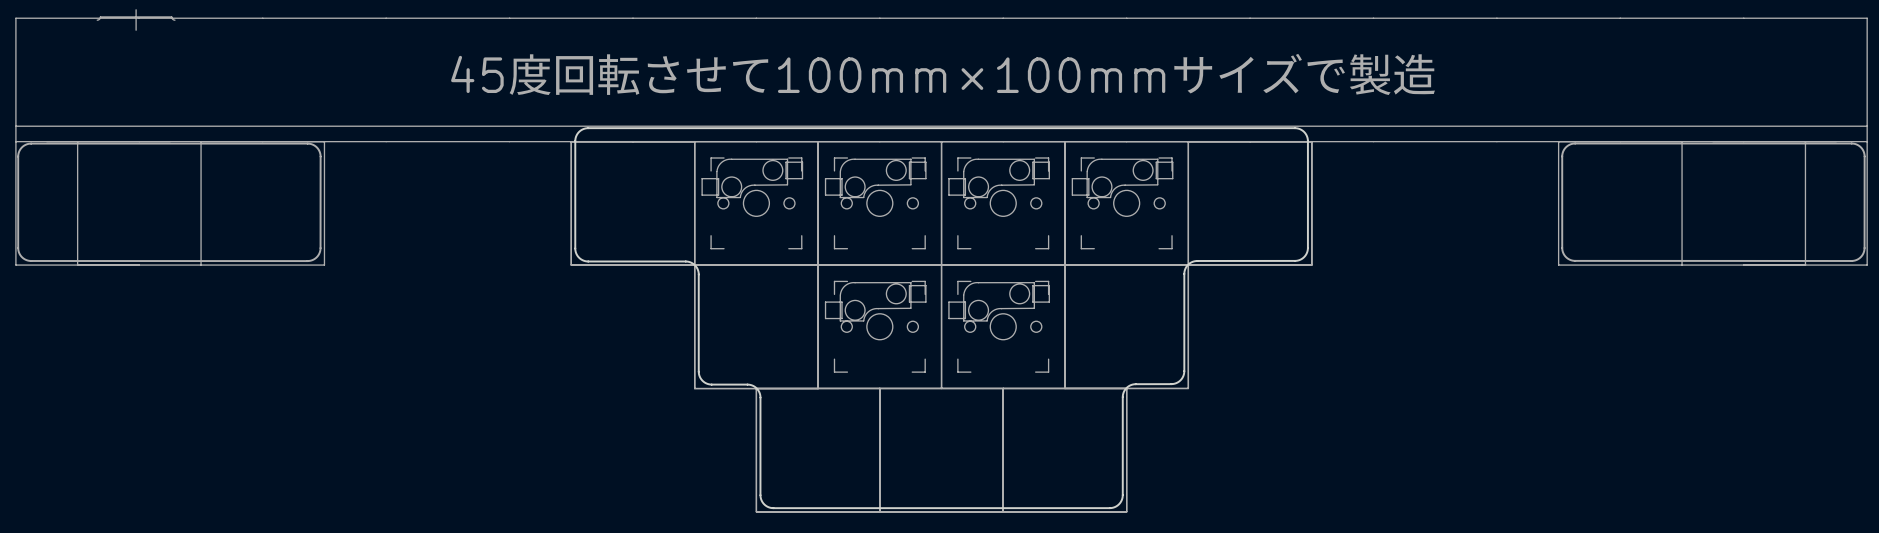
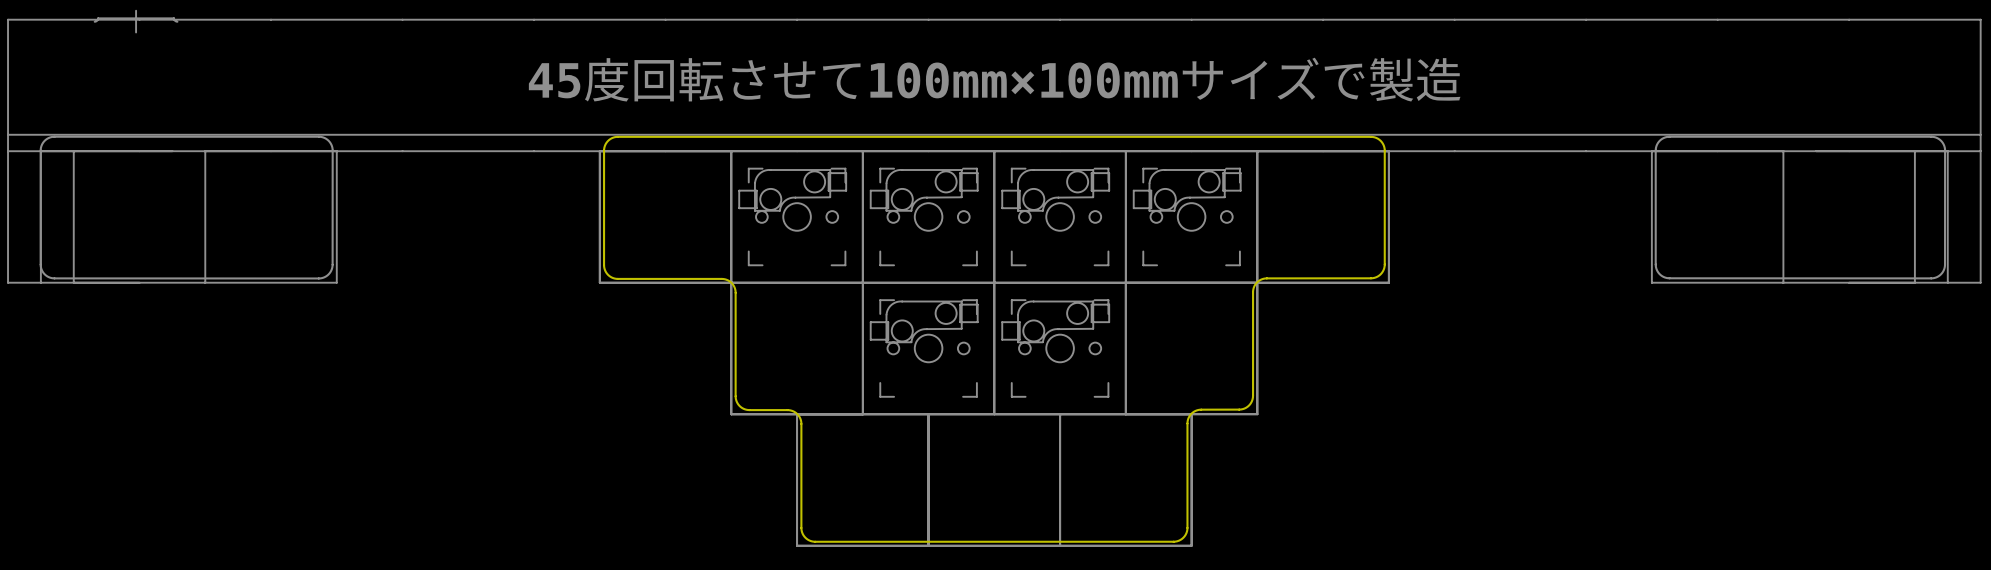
drawing shape: [15, 9, 1868, 513] -> [7, 10, 1982, 547]

